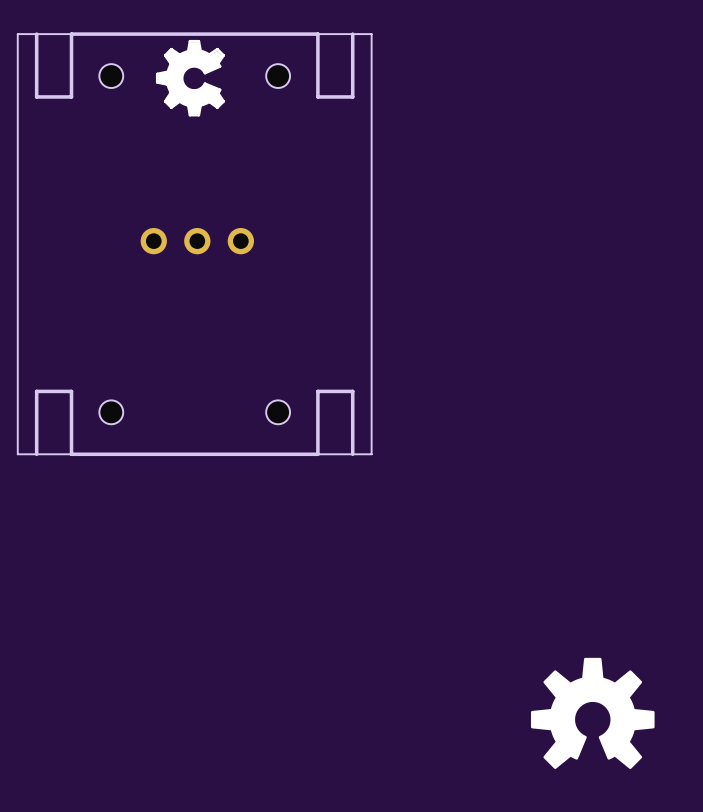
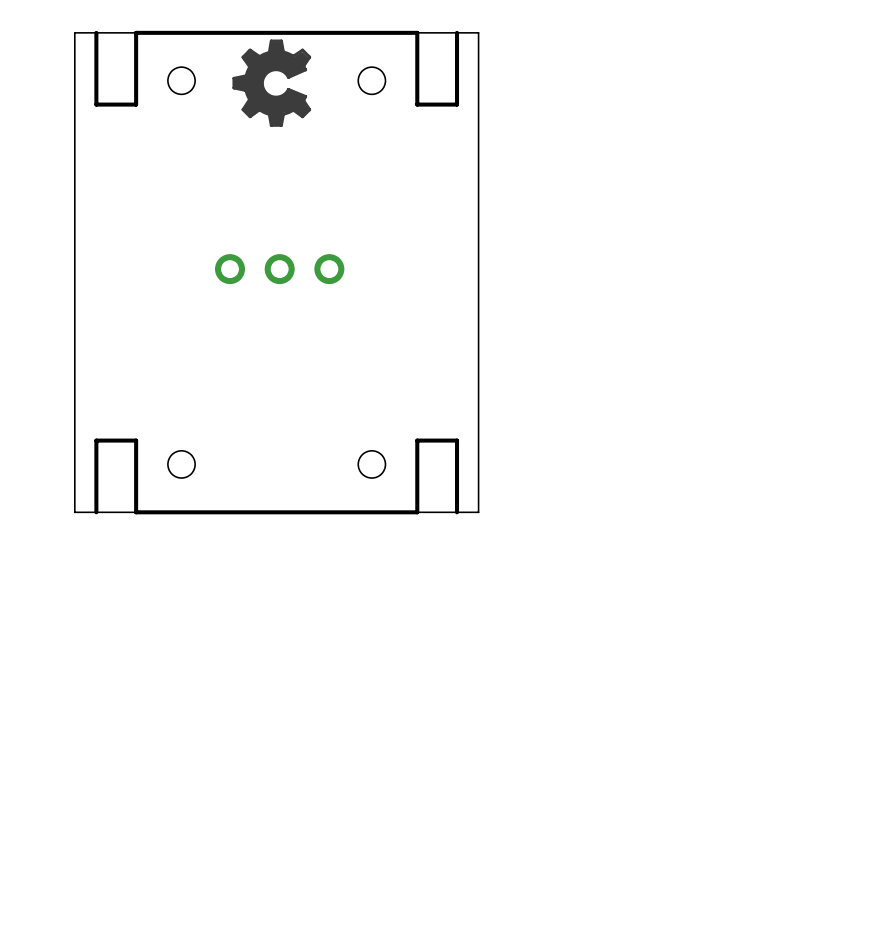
drawing: [530, 657, 655, 769] -> none

